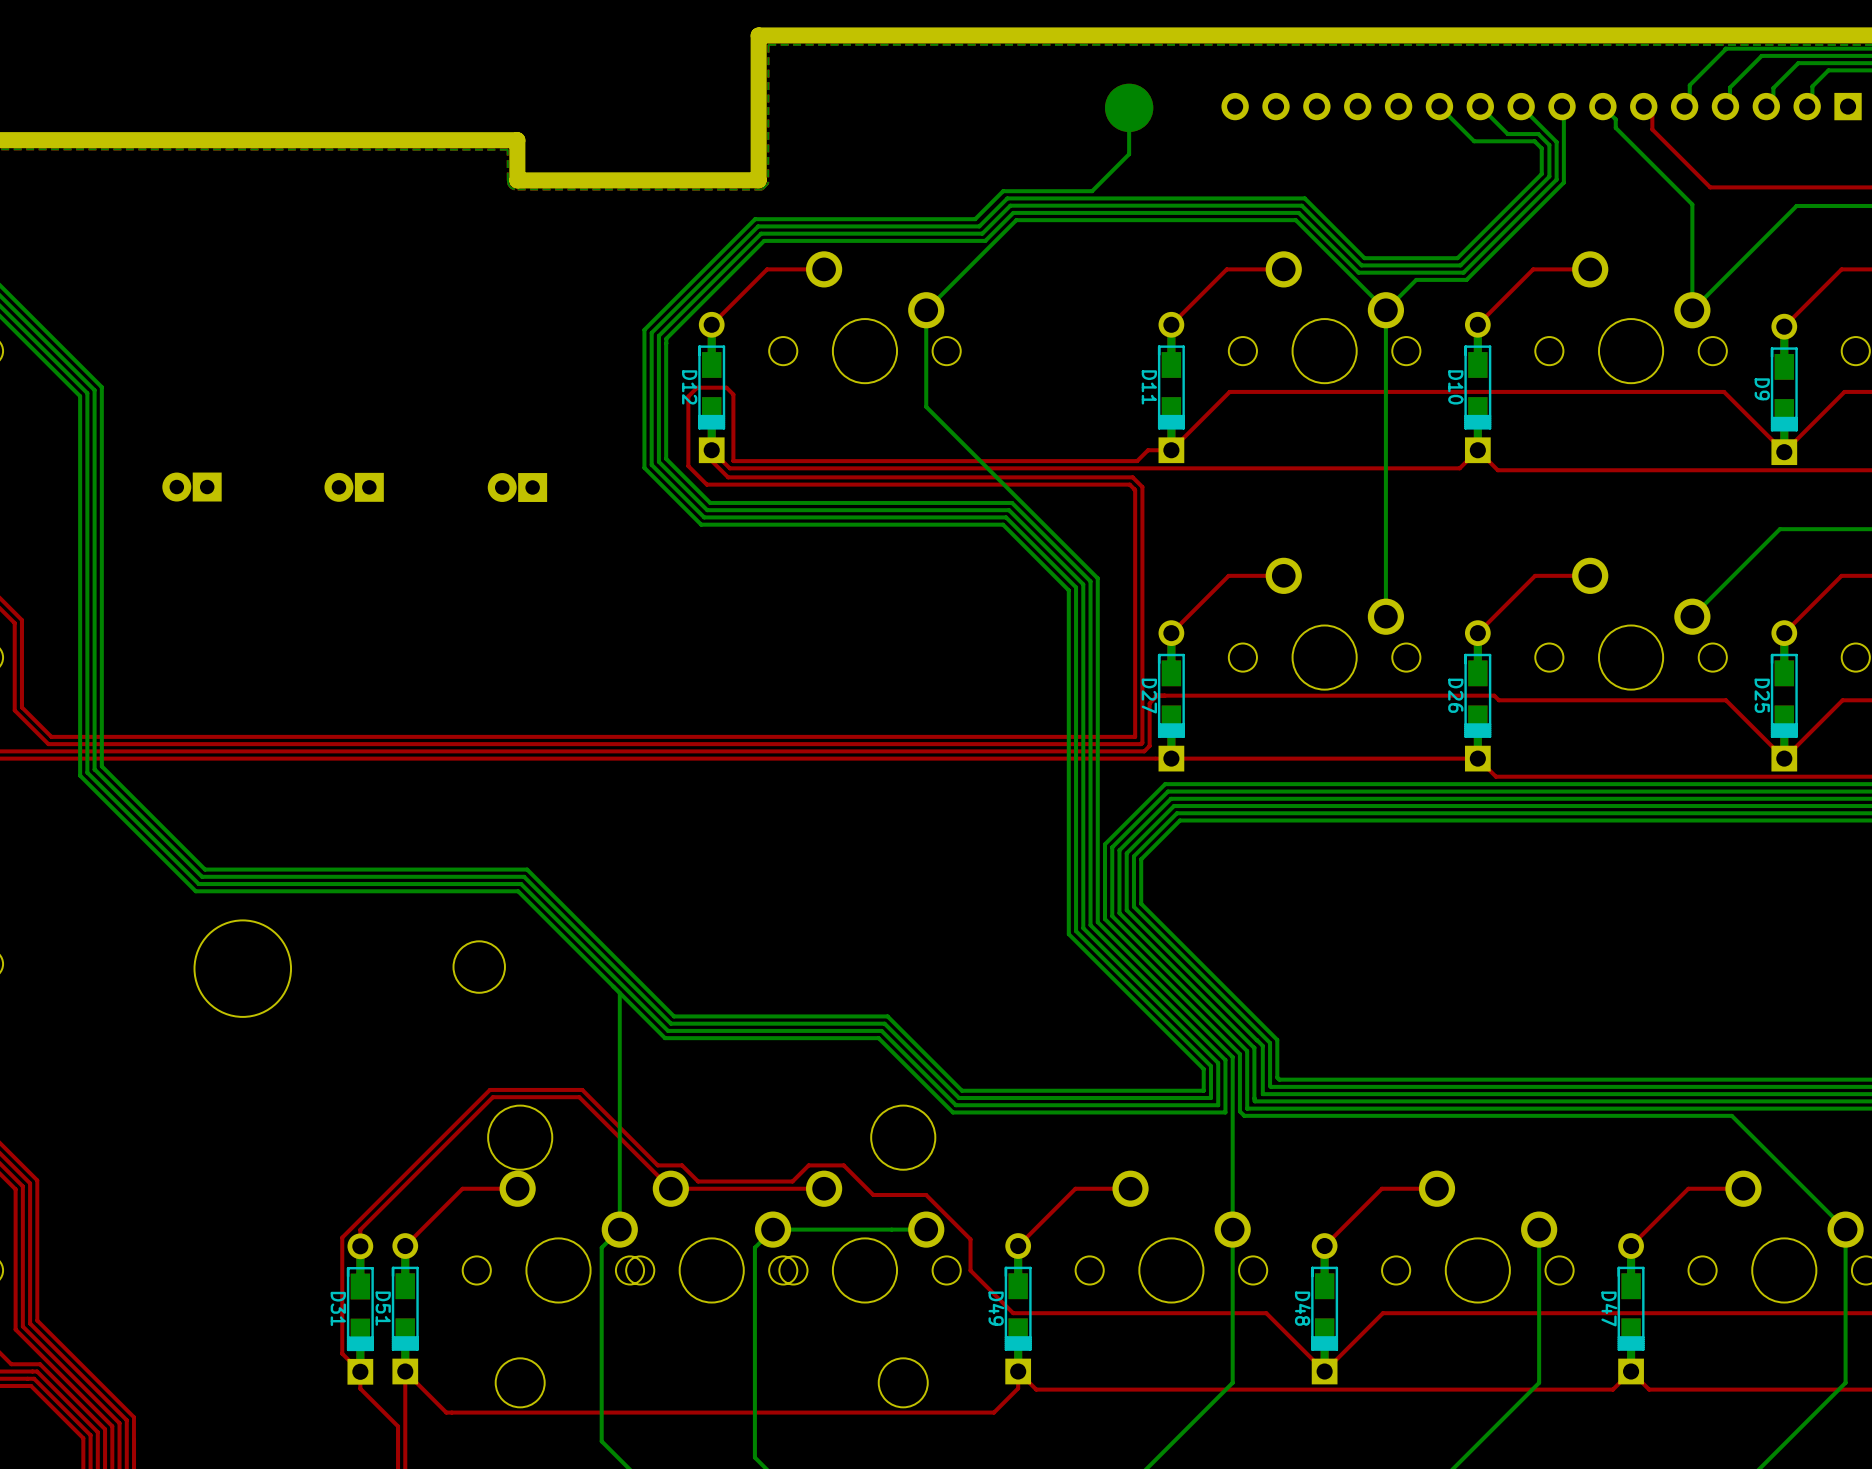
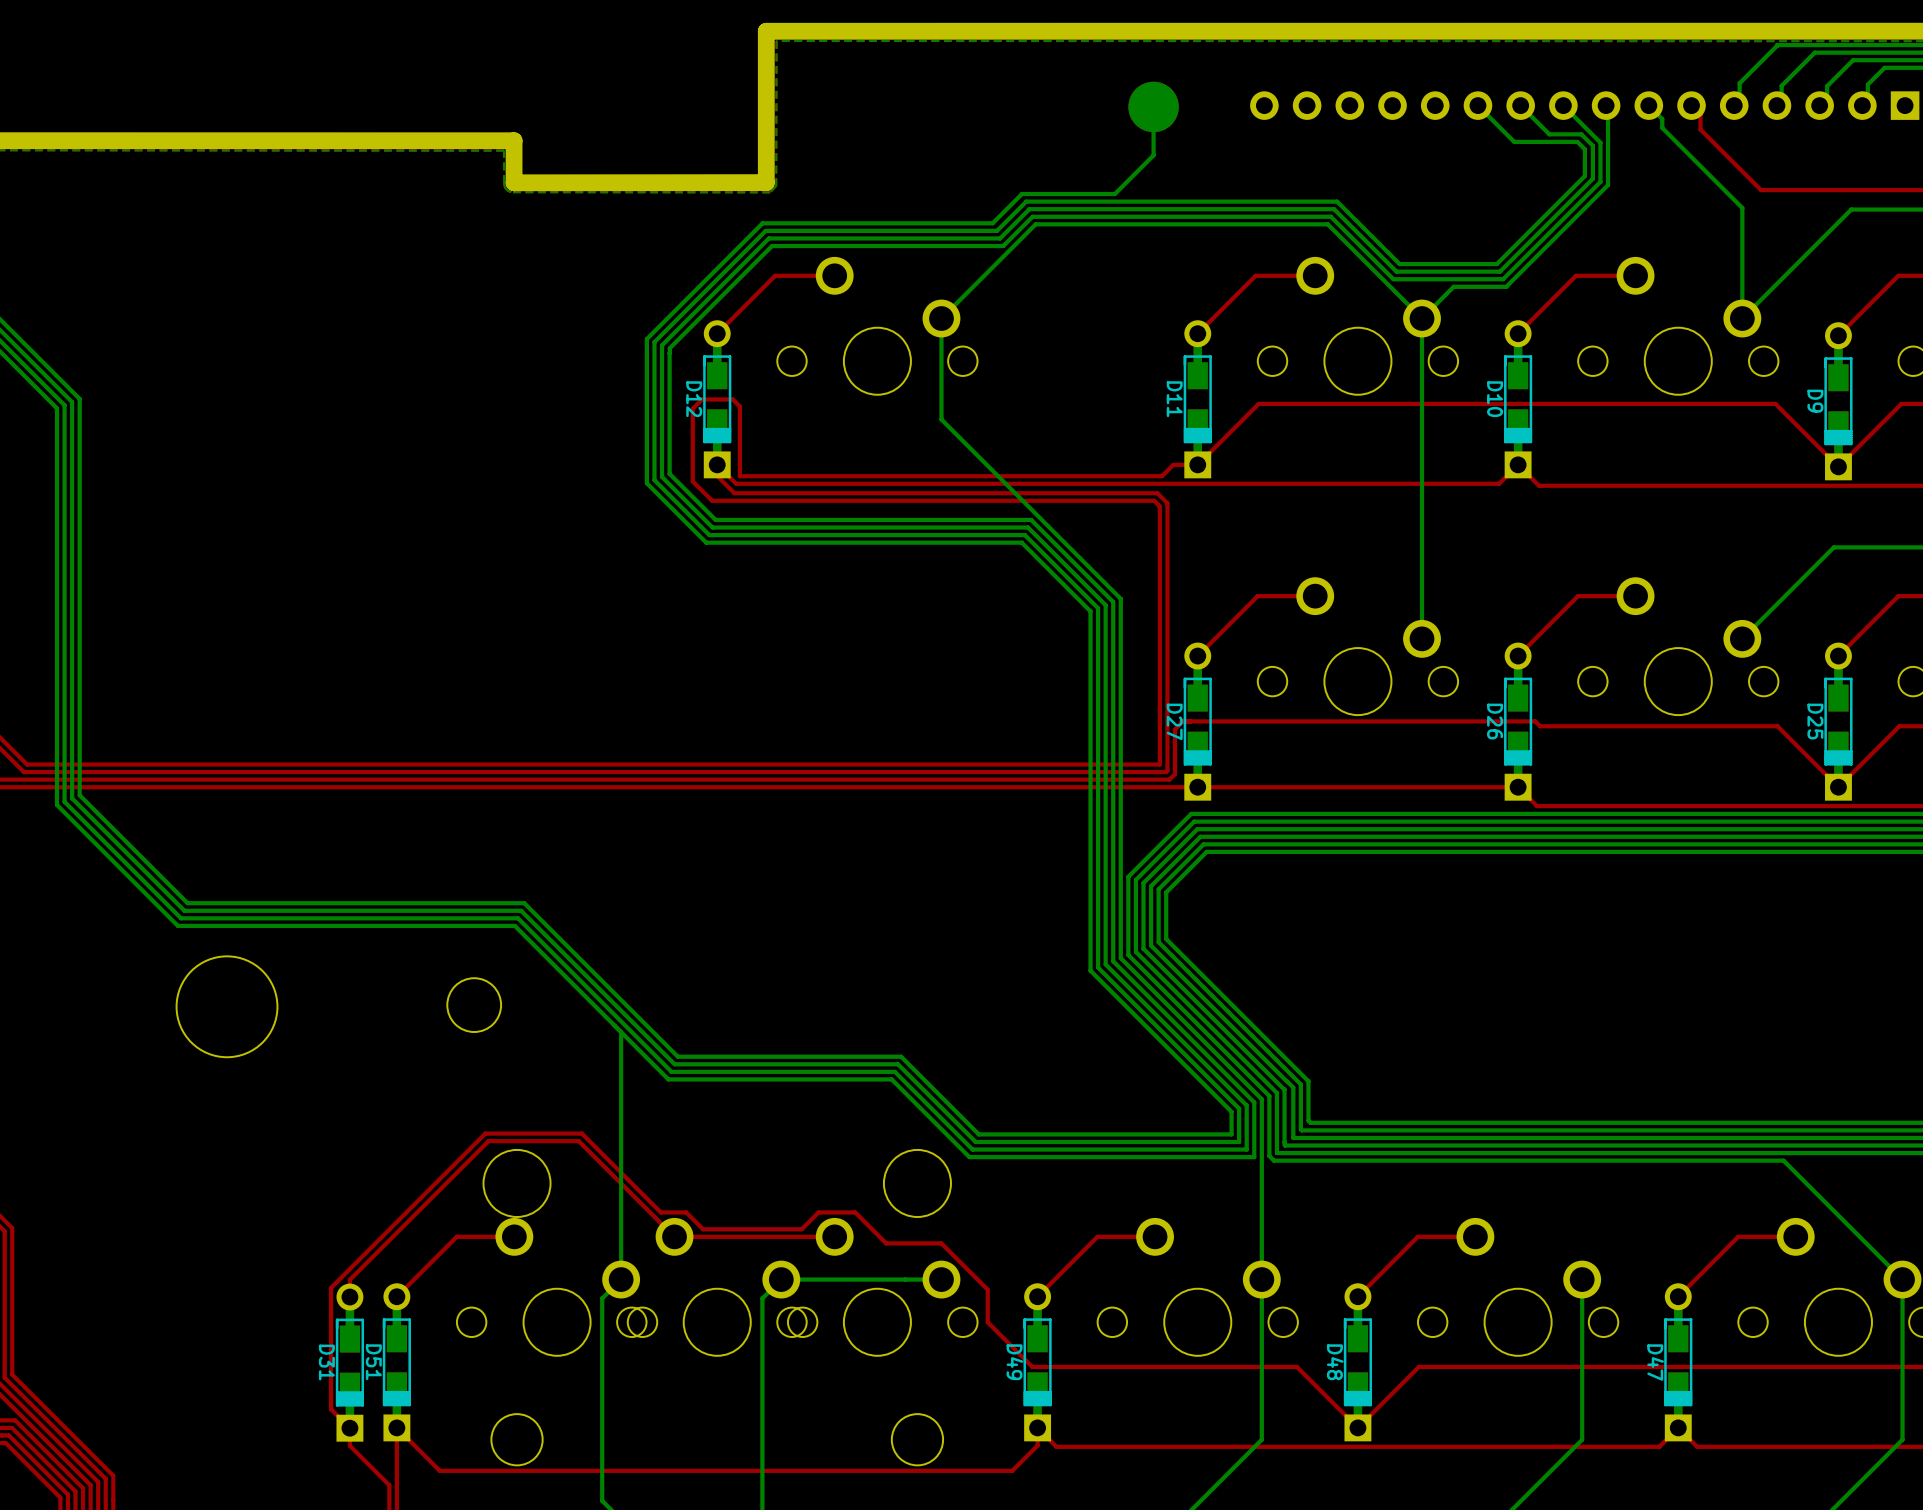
part: (192, 487) -> none
part: (354, 487) -> none
part: (517, 487) -> none

